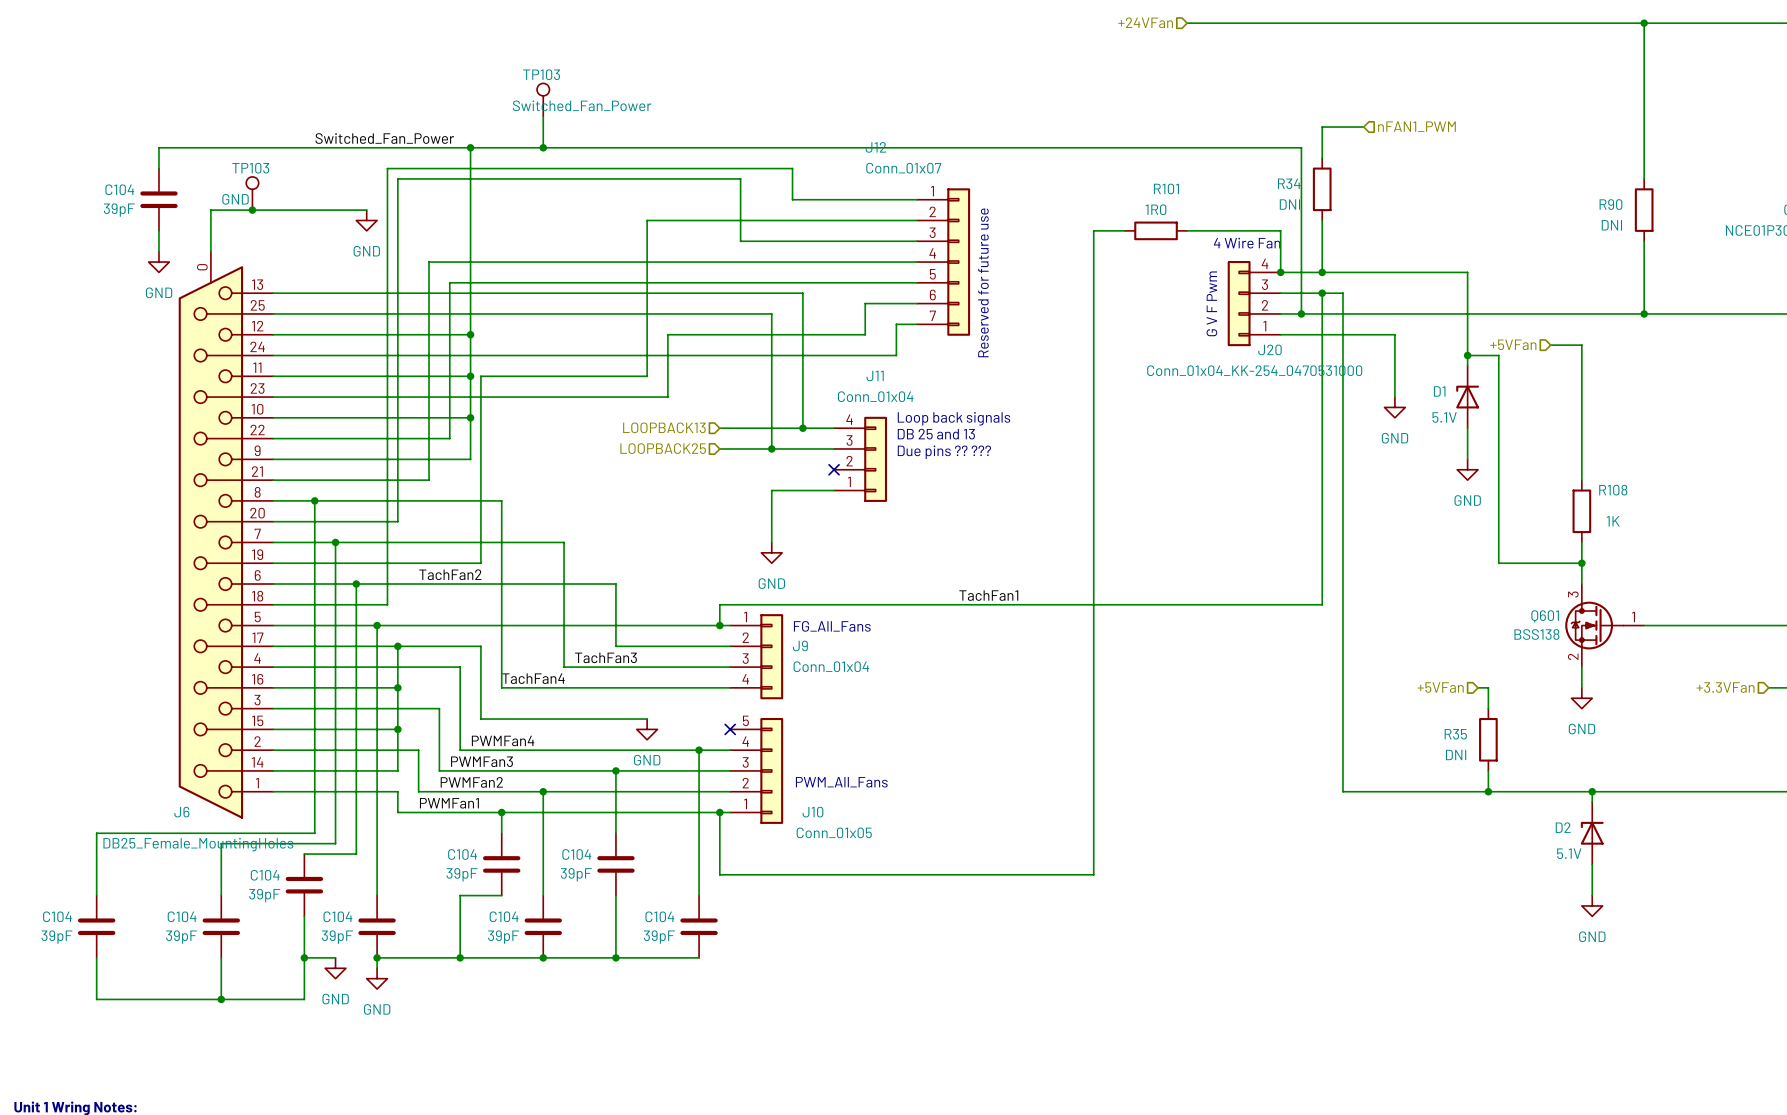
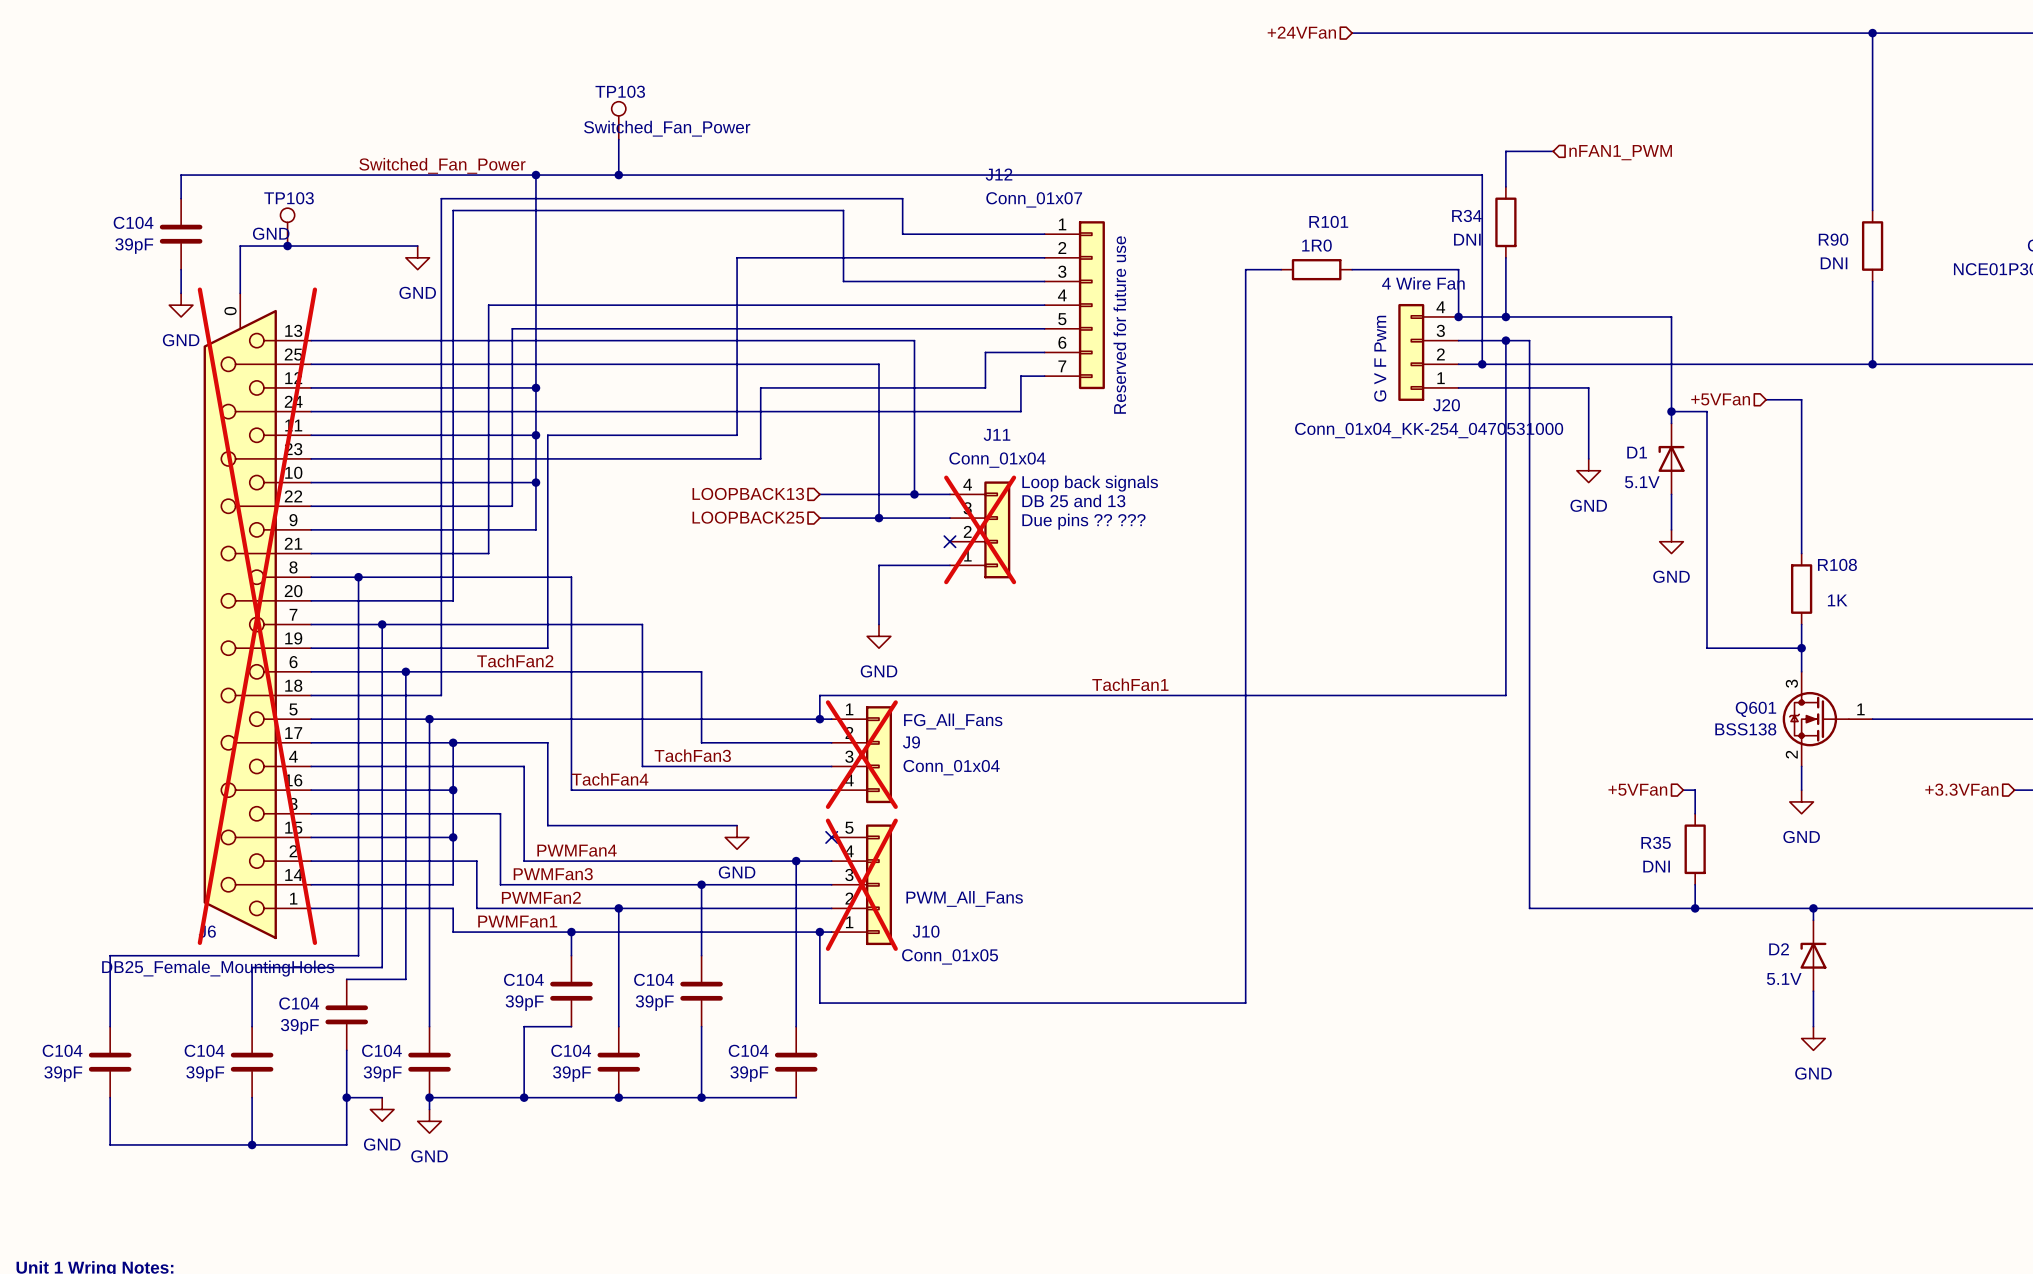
J11 do-not-place cross: none -> (980, 529)
J6 do-not-place cross: none -> (257, 616)
J9 do-not-place cross: none -> (861, 754)
J10 do-not-place cross: none -> (861, 884)

